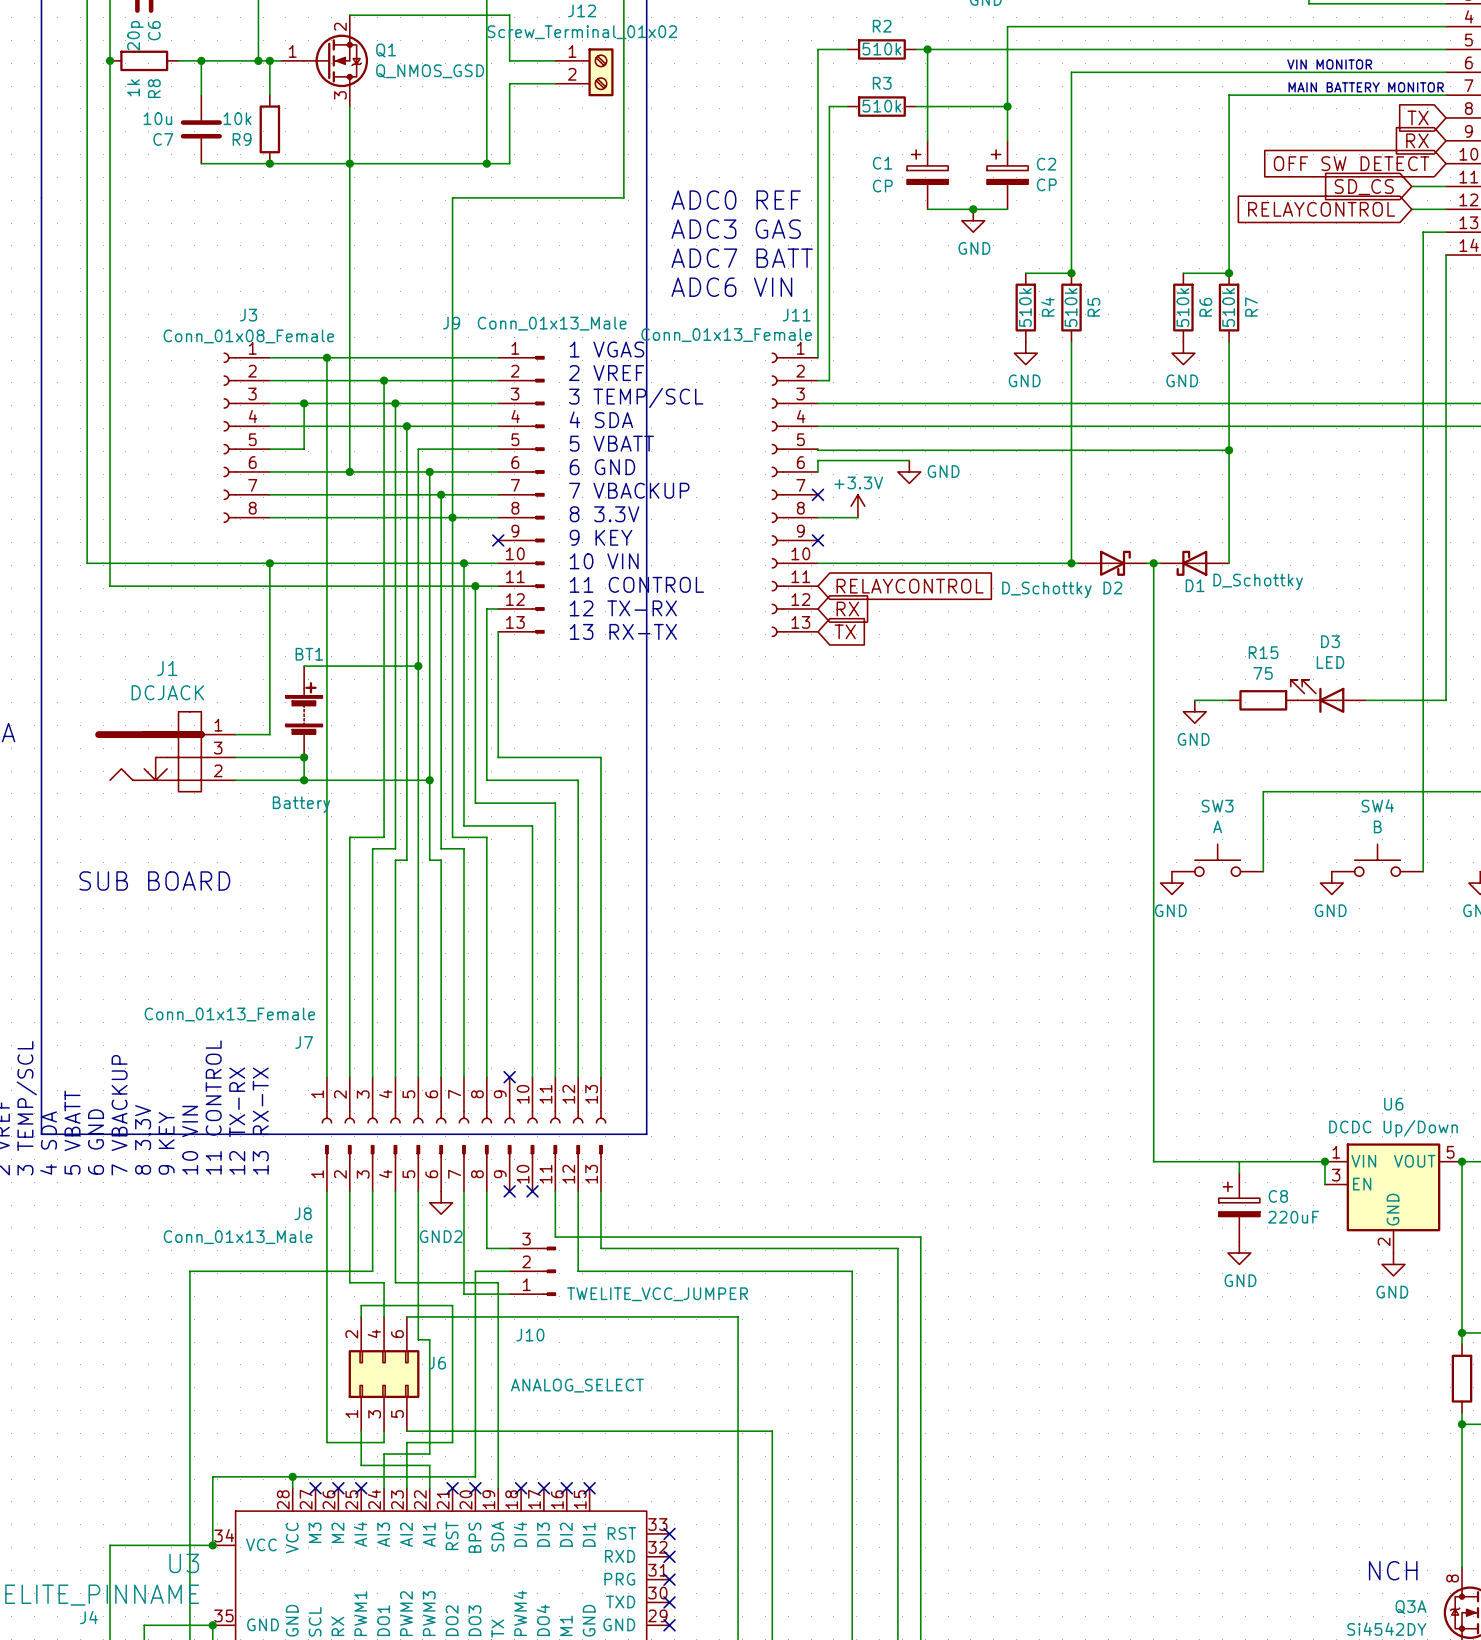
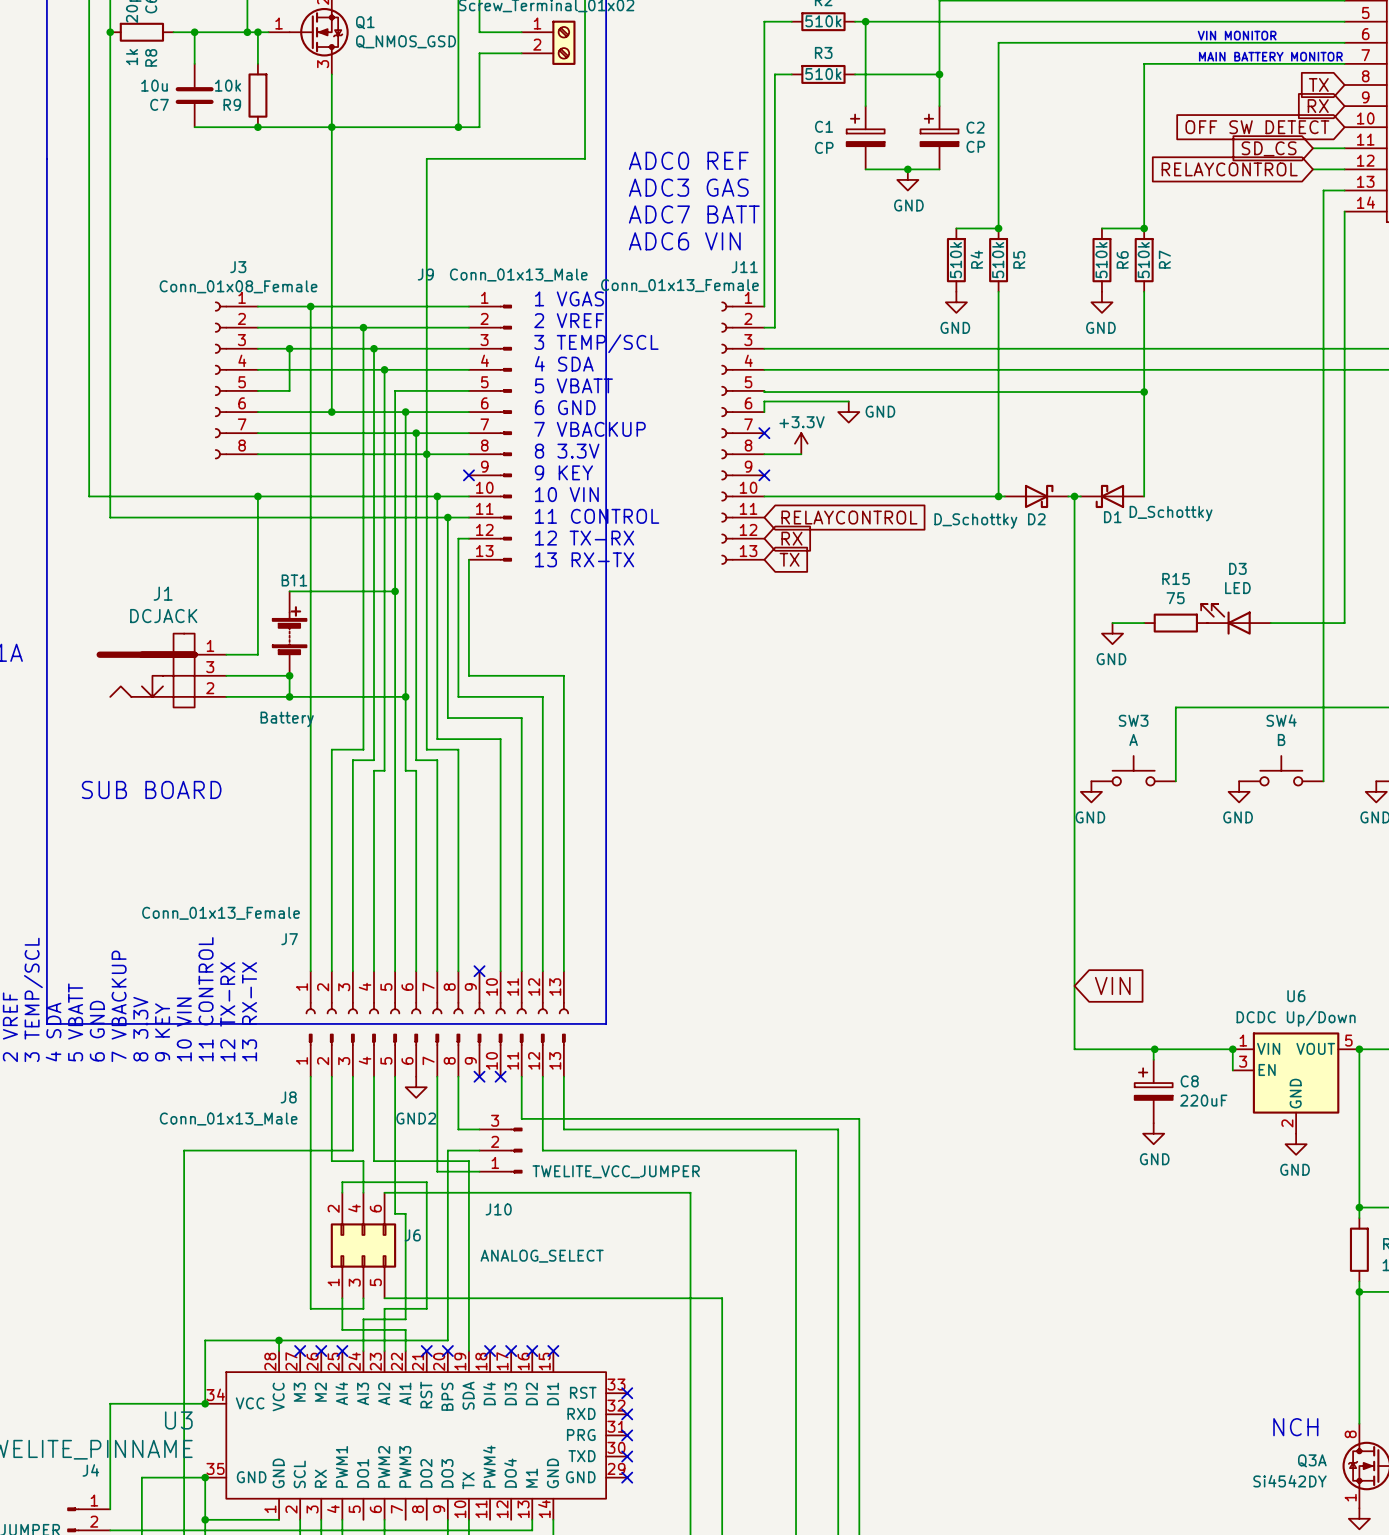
global label: none -> VIN (1112, 985)
junction: none -> (1154, 1049)

